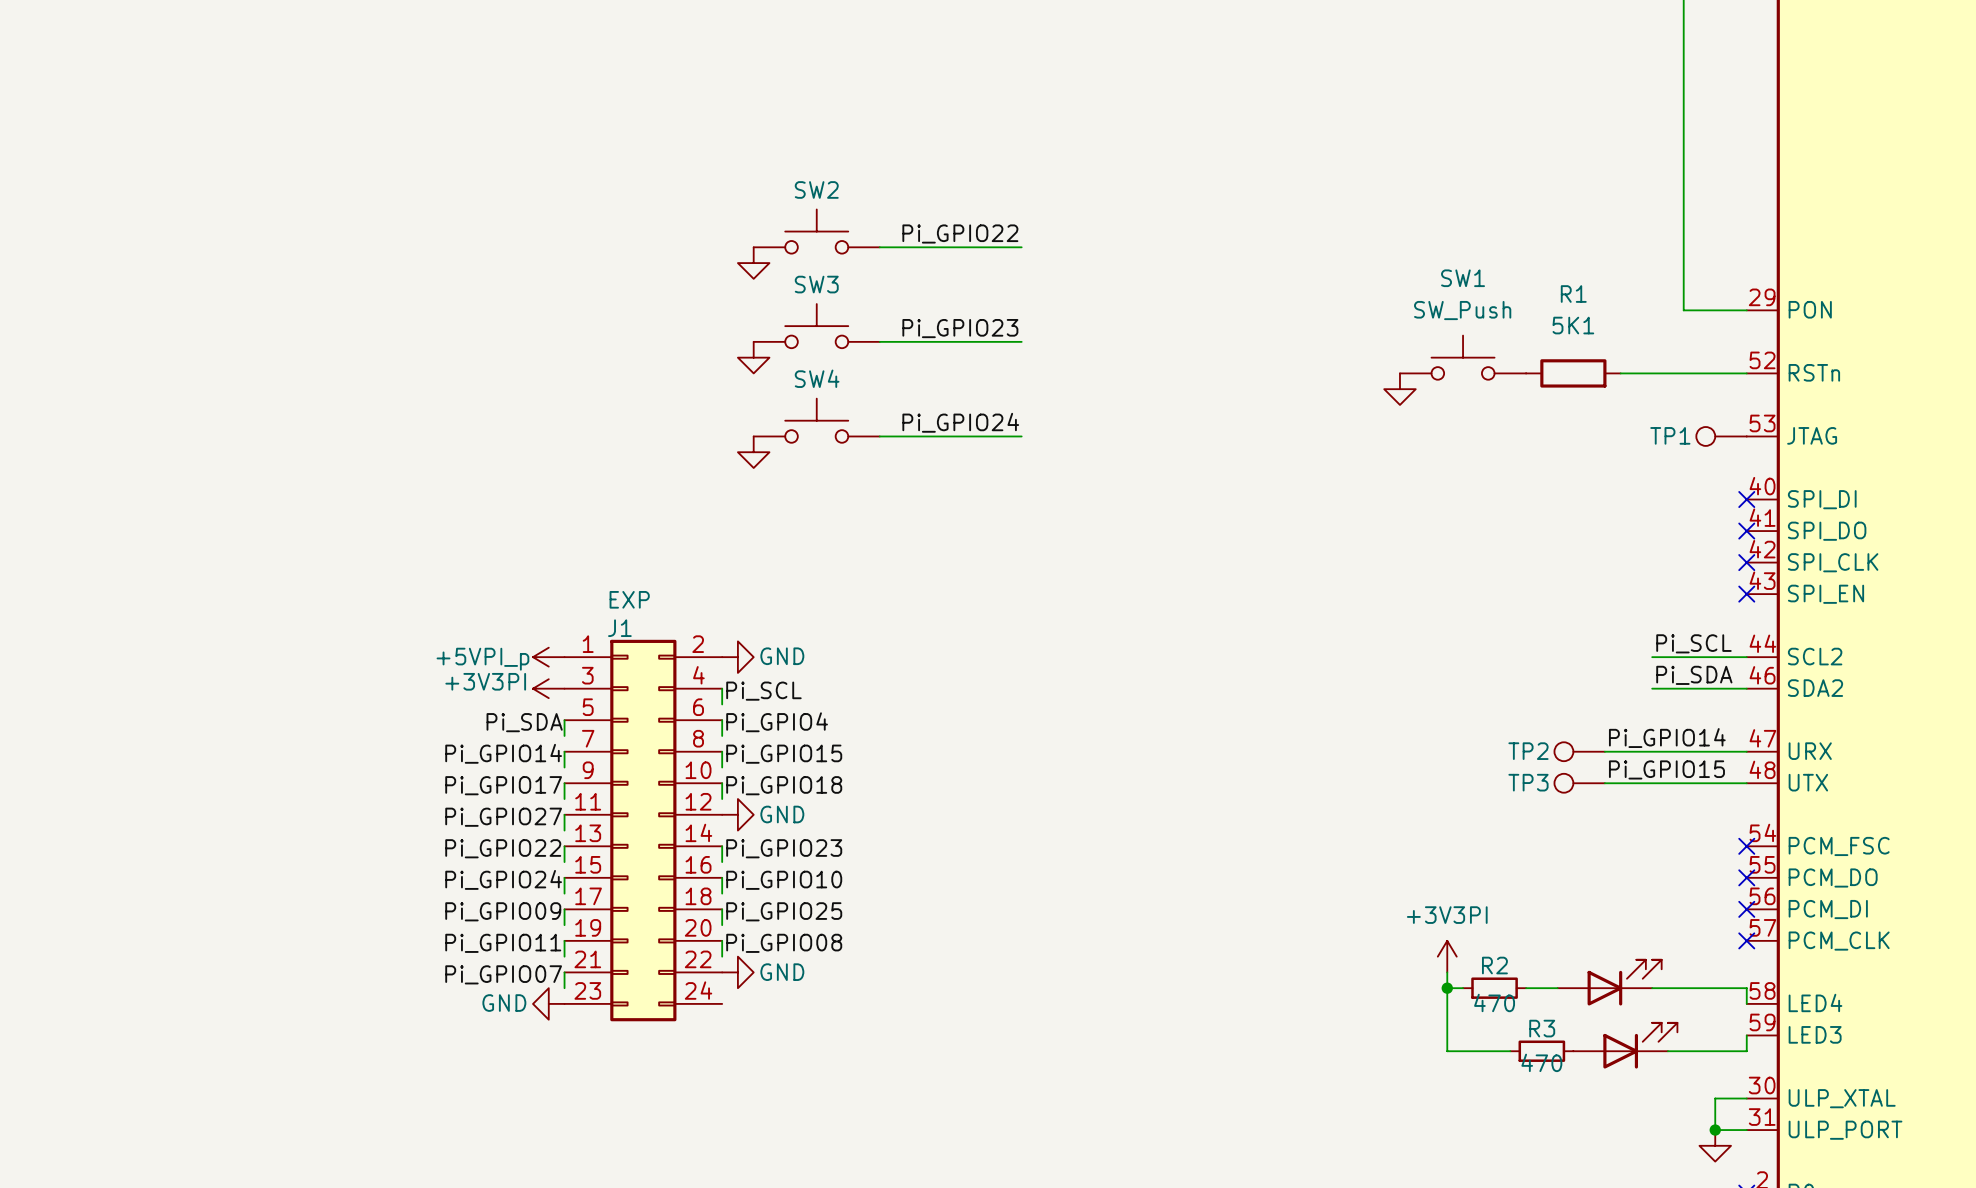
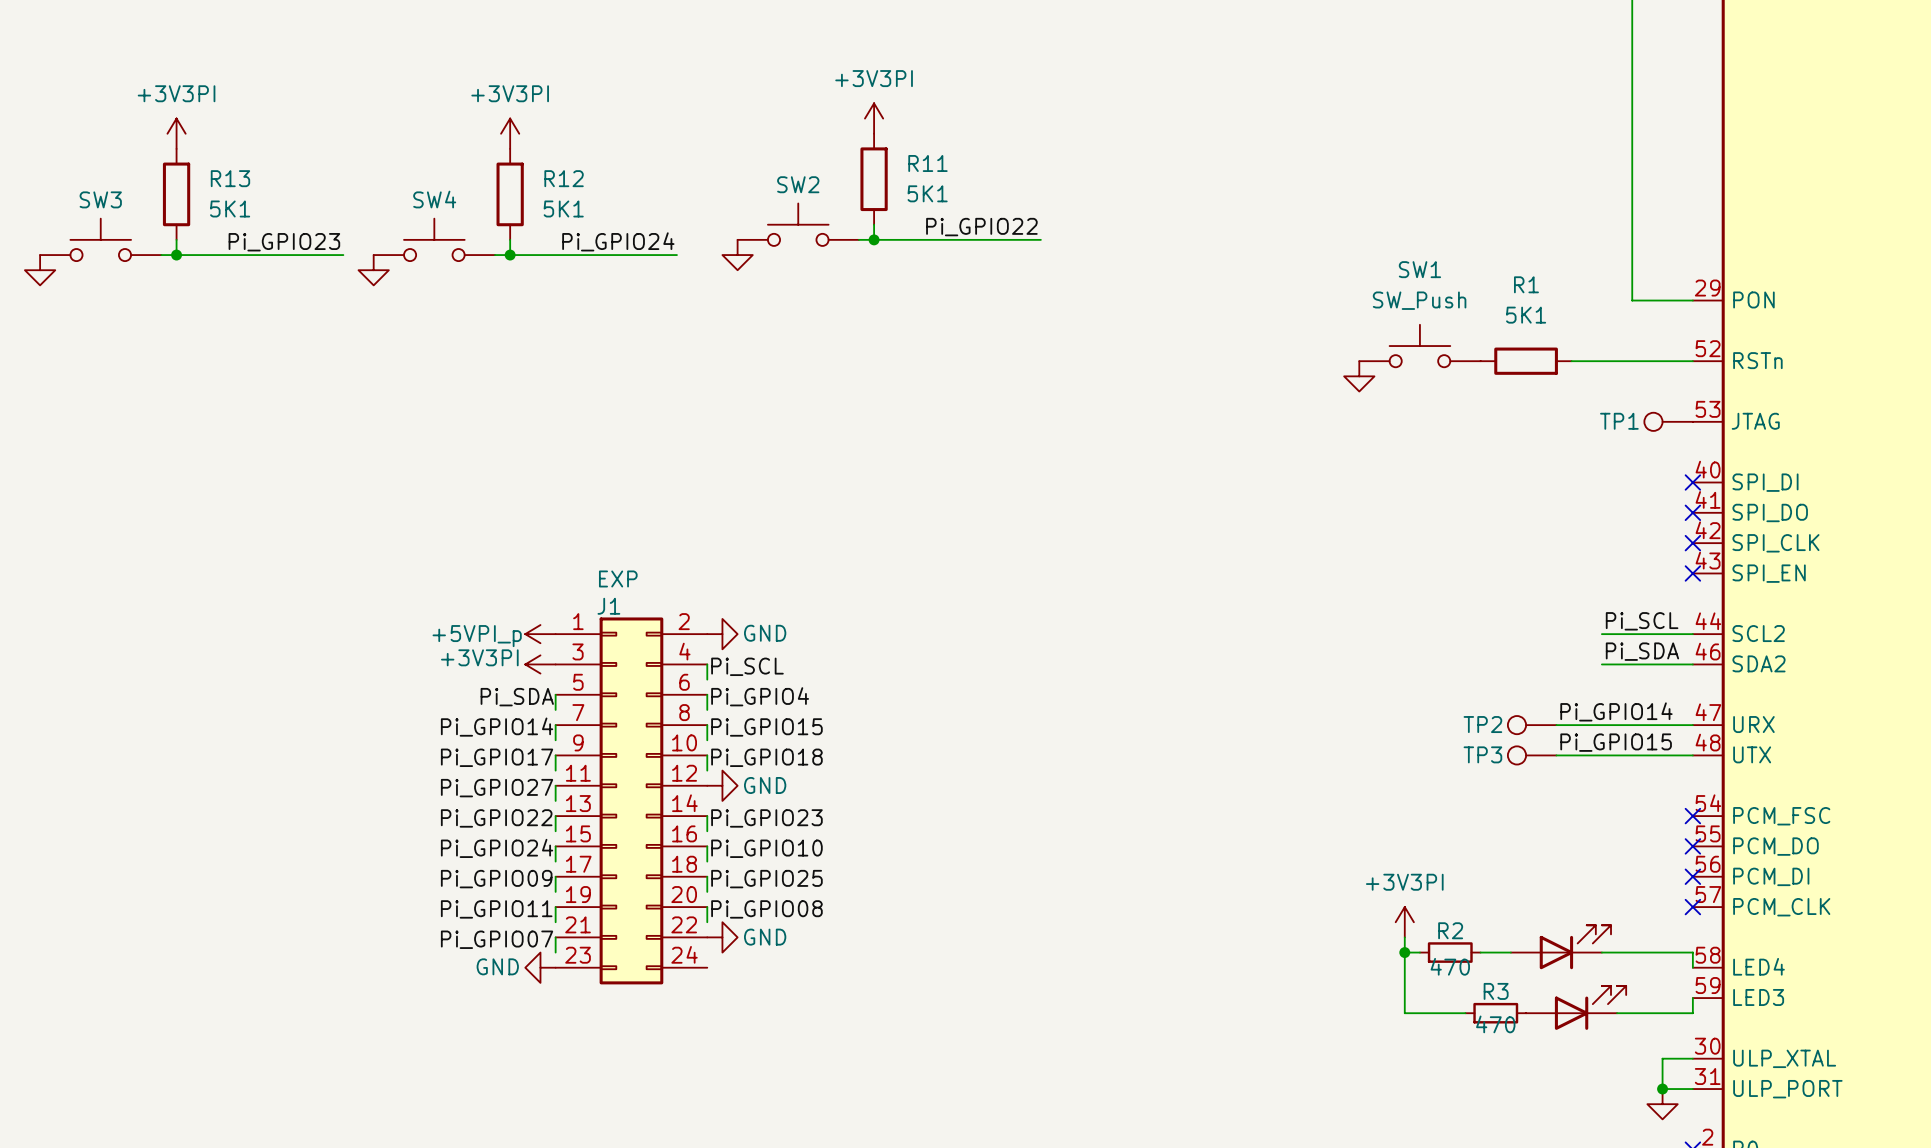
power symbol: none -> +3V3PI (874, 118)
power symbol: none -> +3V3PI (176, 133)
power symbol: none -> +3V3PI (510, 133)
R11: none -> 5K1 (874, 179)
R13: none -> 5K1 (176, 194)
R12: none -> 5K1 (510, 194)
wire: none -> (874, 224) (874, 239)
label position: Pi_GPIO22 (960, 233) -> Pi_GPIO22 (981, 227)
wire: none -> (176, 239) (176, 255)
wire: none -> (510, 239) (510, 255)
junction: none -> (874, 239)
wire: none -> (995, 239) (1040, 239)
label: none -> Pi_GPIO23 (284, 242)
label: none -> Pi_GPIO24 (618, 241)
wire: none -> (161, 255) (343, 255)
junction: none -> (176, 255)
wire: none -> (494, 255) (676, 255)
junction: none -> (510, 255)
power symbol: none -> (40, 270)
power symbol: none -> (373, 270)
SW3 position: (816, 326) -> (100, 239)
label: Pi_GPIO23 (960, 328) -> none
wire: (879, 341) (1021, 341) -> none
power symbol: (753, 357) -> none
SW4 position: (816, 420) -> (434, 239)
label: Pi_GPIO24 (960, 422) -> none
wire: (879, 436) (1021, 436) -> none
power symbol: (753, 452) -> none

